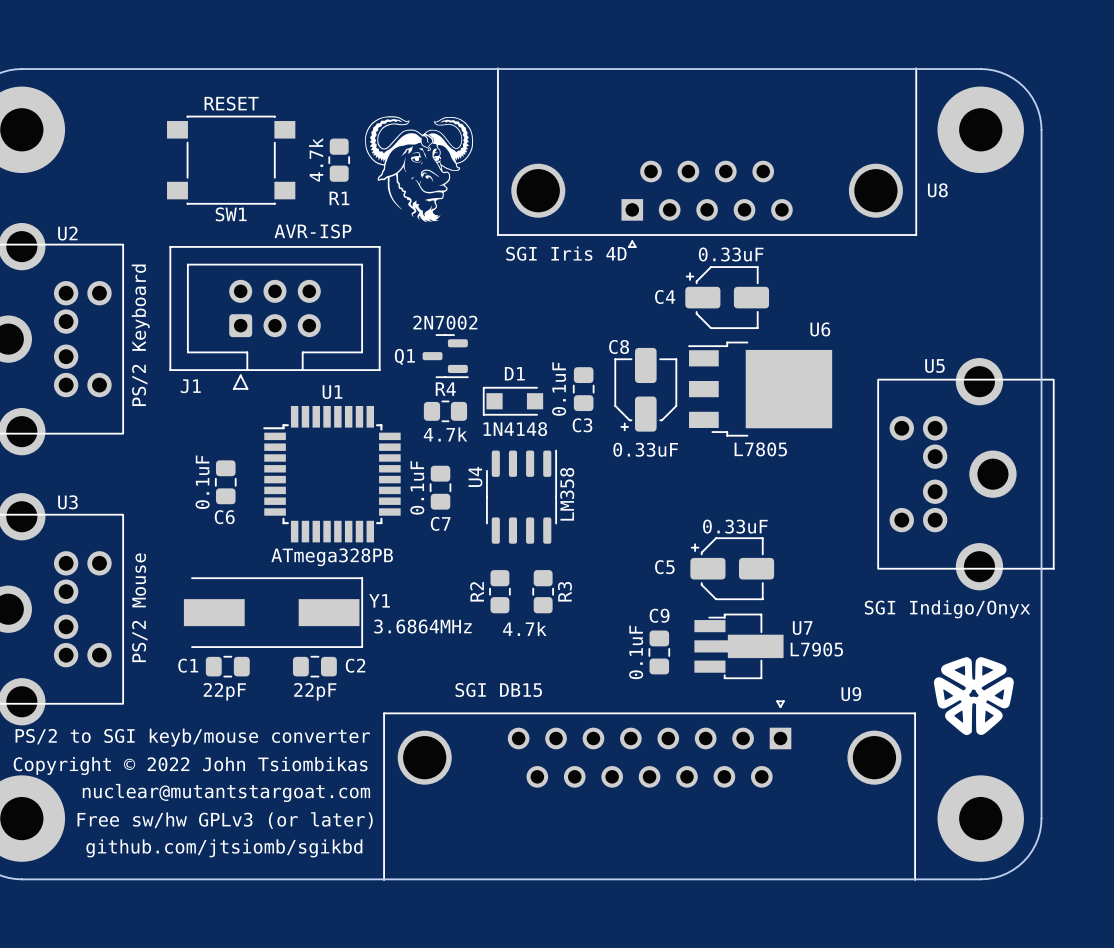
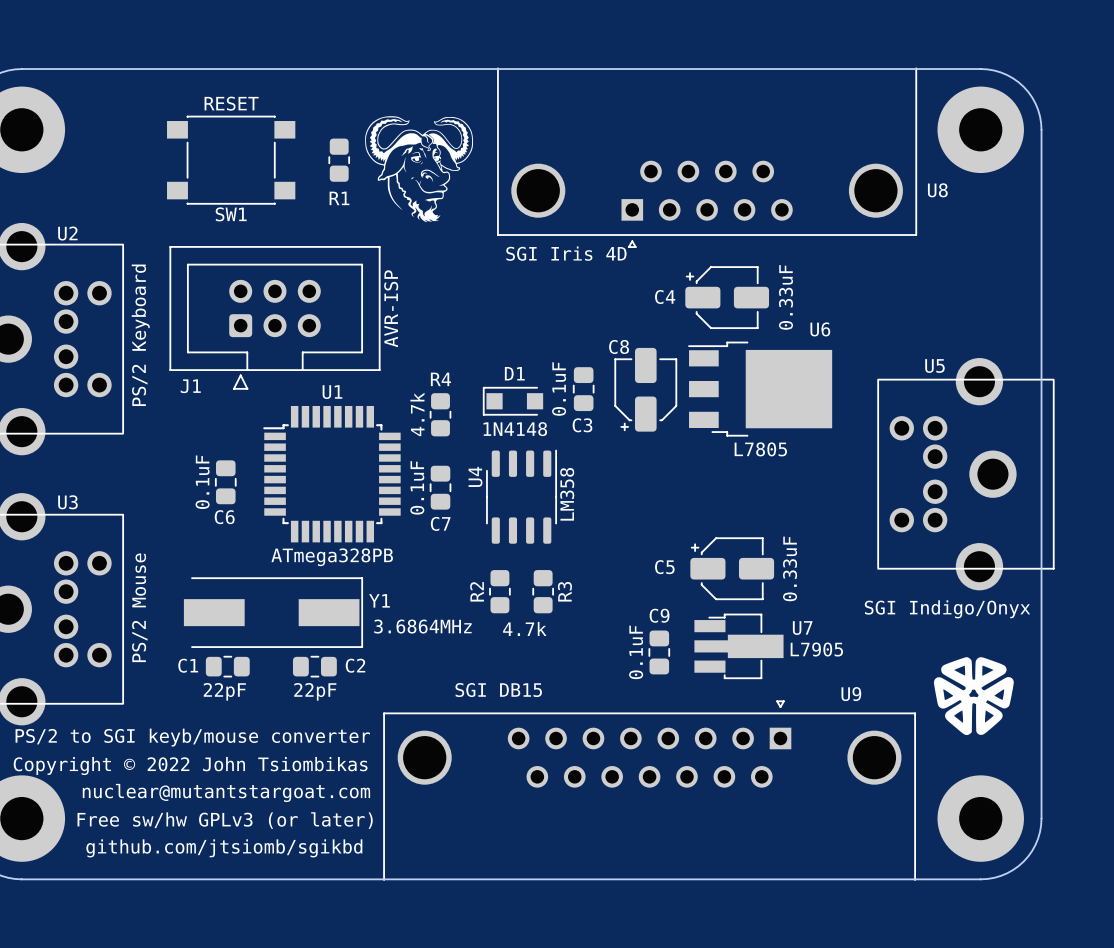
R1 value: 4.7k (316, 159) -> none
J1 value rotation: 0° (313, 231) -> 90° counterclockwise (391, 308)
J1 value position: AVR-ISP (313, 231) -> AVR-ISP (391, 308)
C4 value rotation: 0° (731, 254) -> 90° counterclockwise (786, 297)
Q1: 2N7002 (445, 356) -> none
R4 rotation: 0° (445, 411) -> 90° clockwise (440, 414)
C8 value: 0.33uF (645, 449) -> none
C5 value rotation: 0° (735, 526) -> 90° counterclockwise (790, 568)

